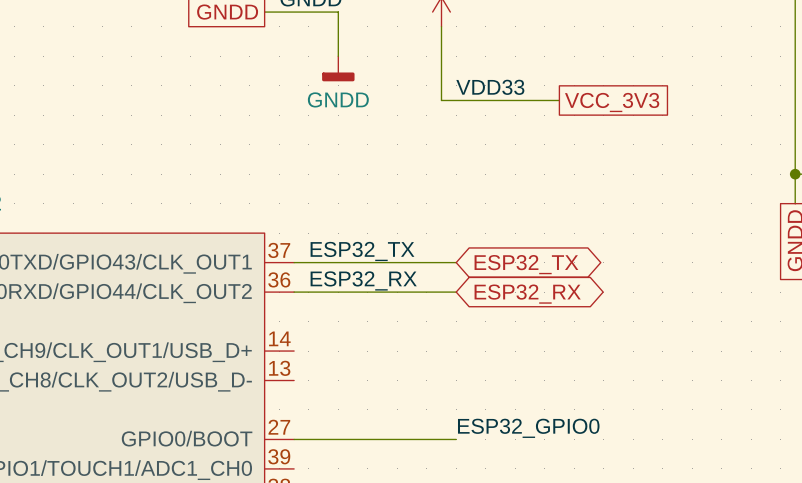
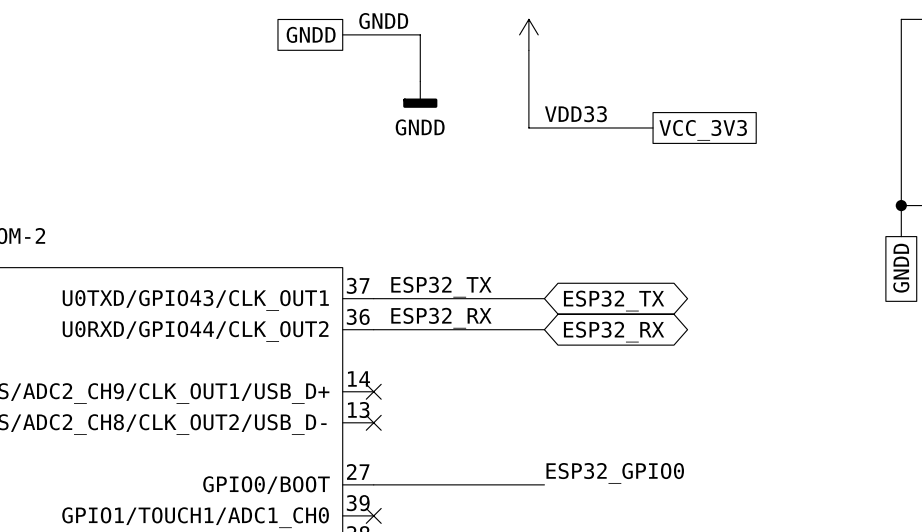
no-connect mark: none -> (373, 391)
no-connect mark: none -> (373, 422)
no-connect mark: none -> (373, 515)

